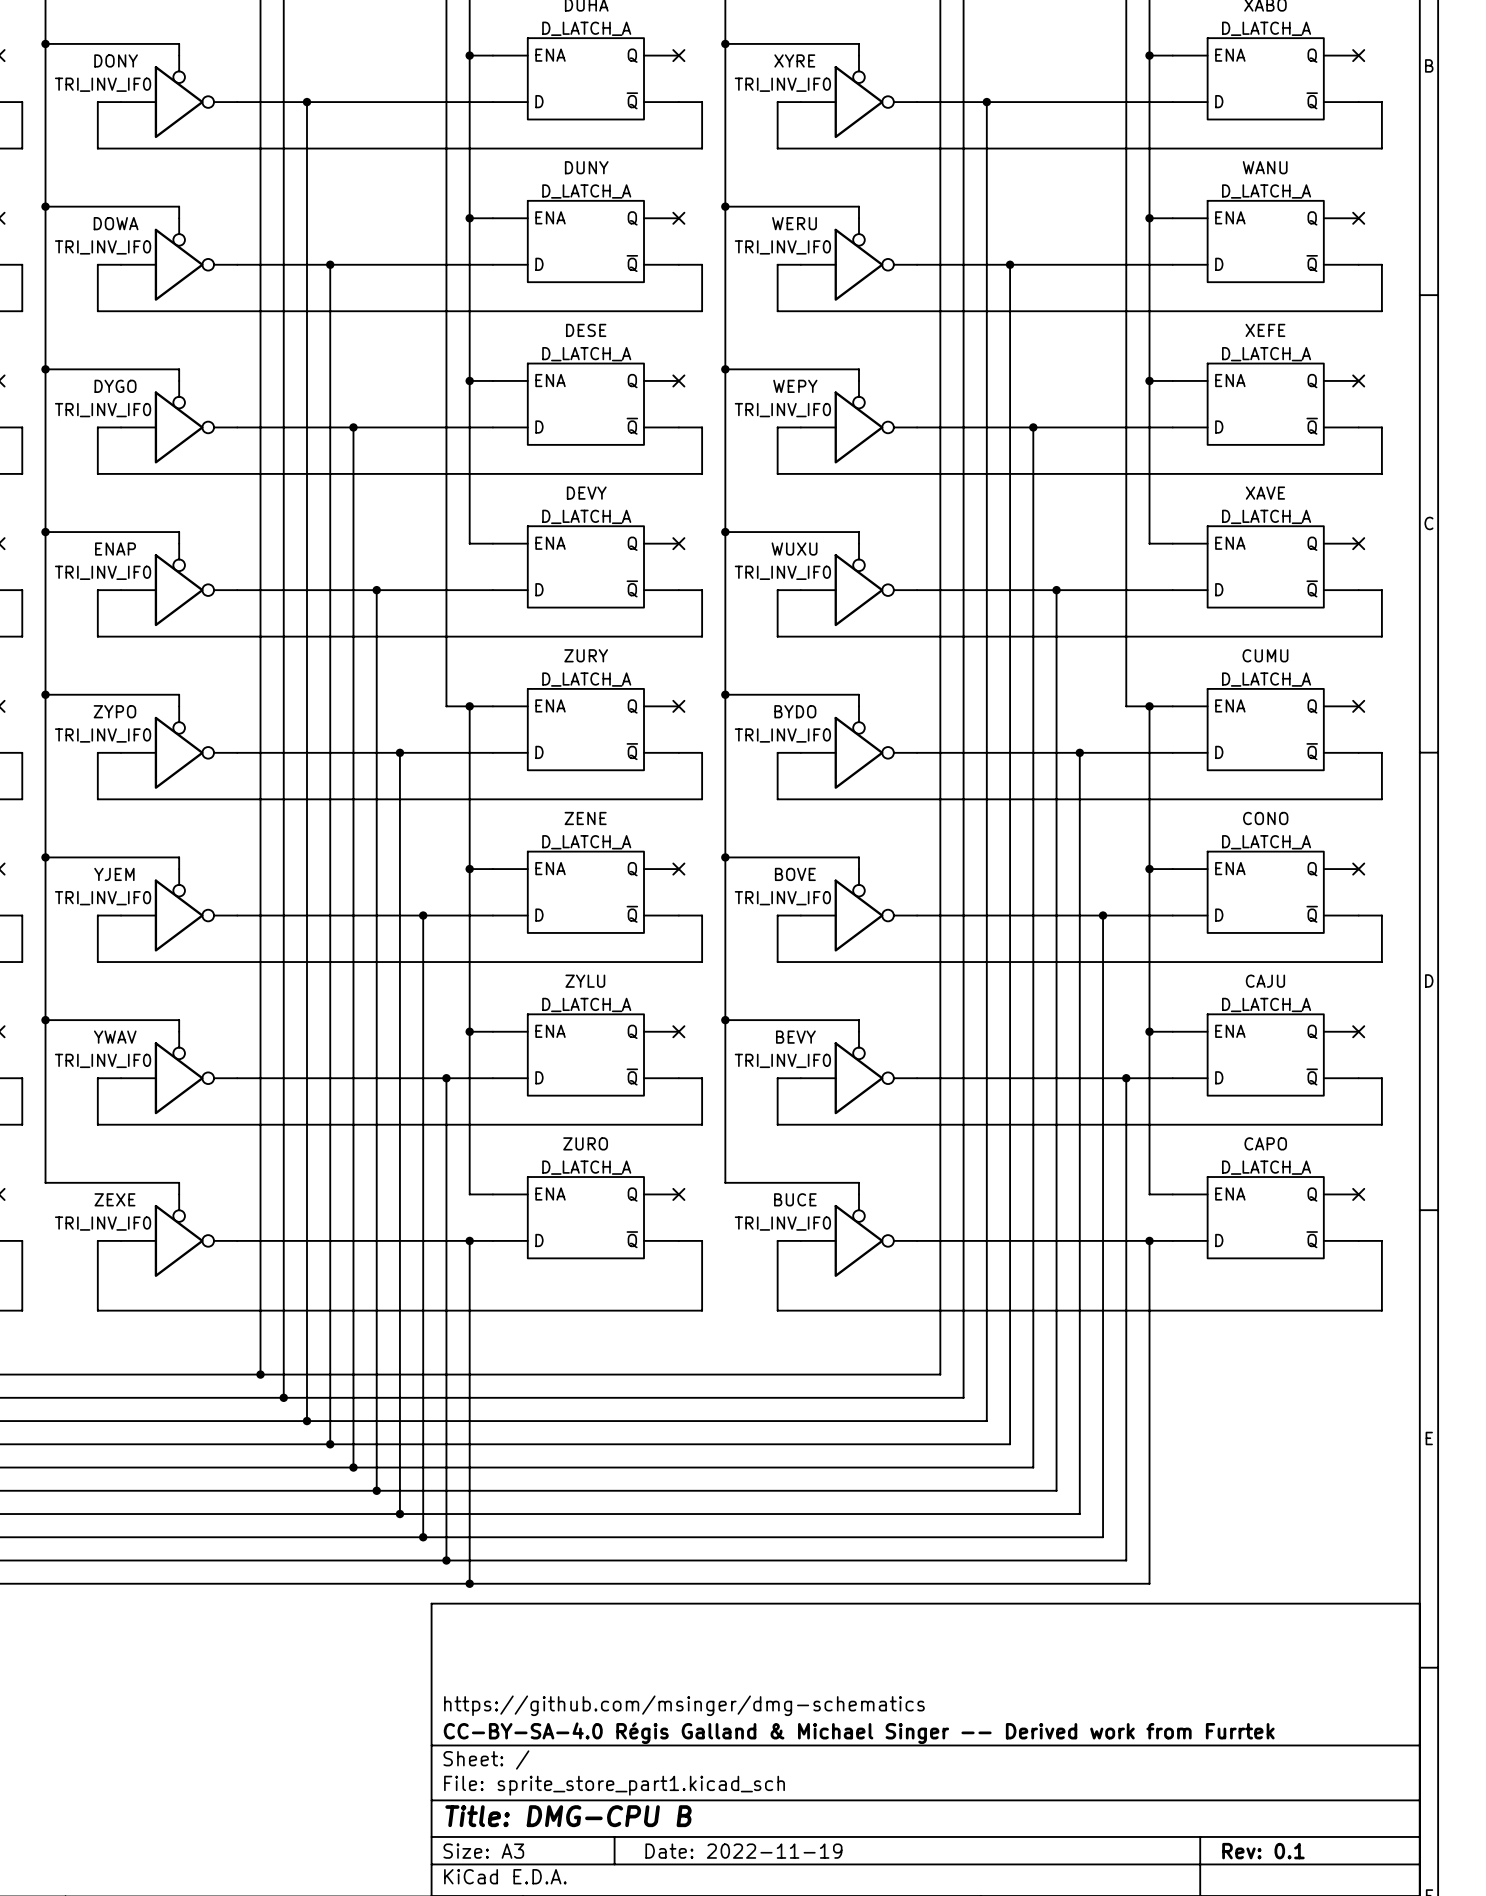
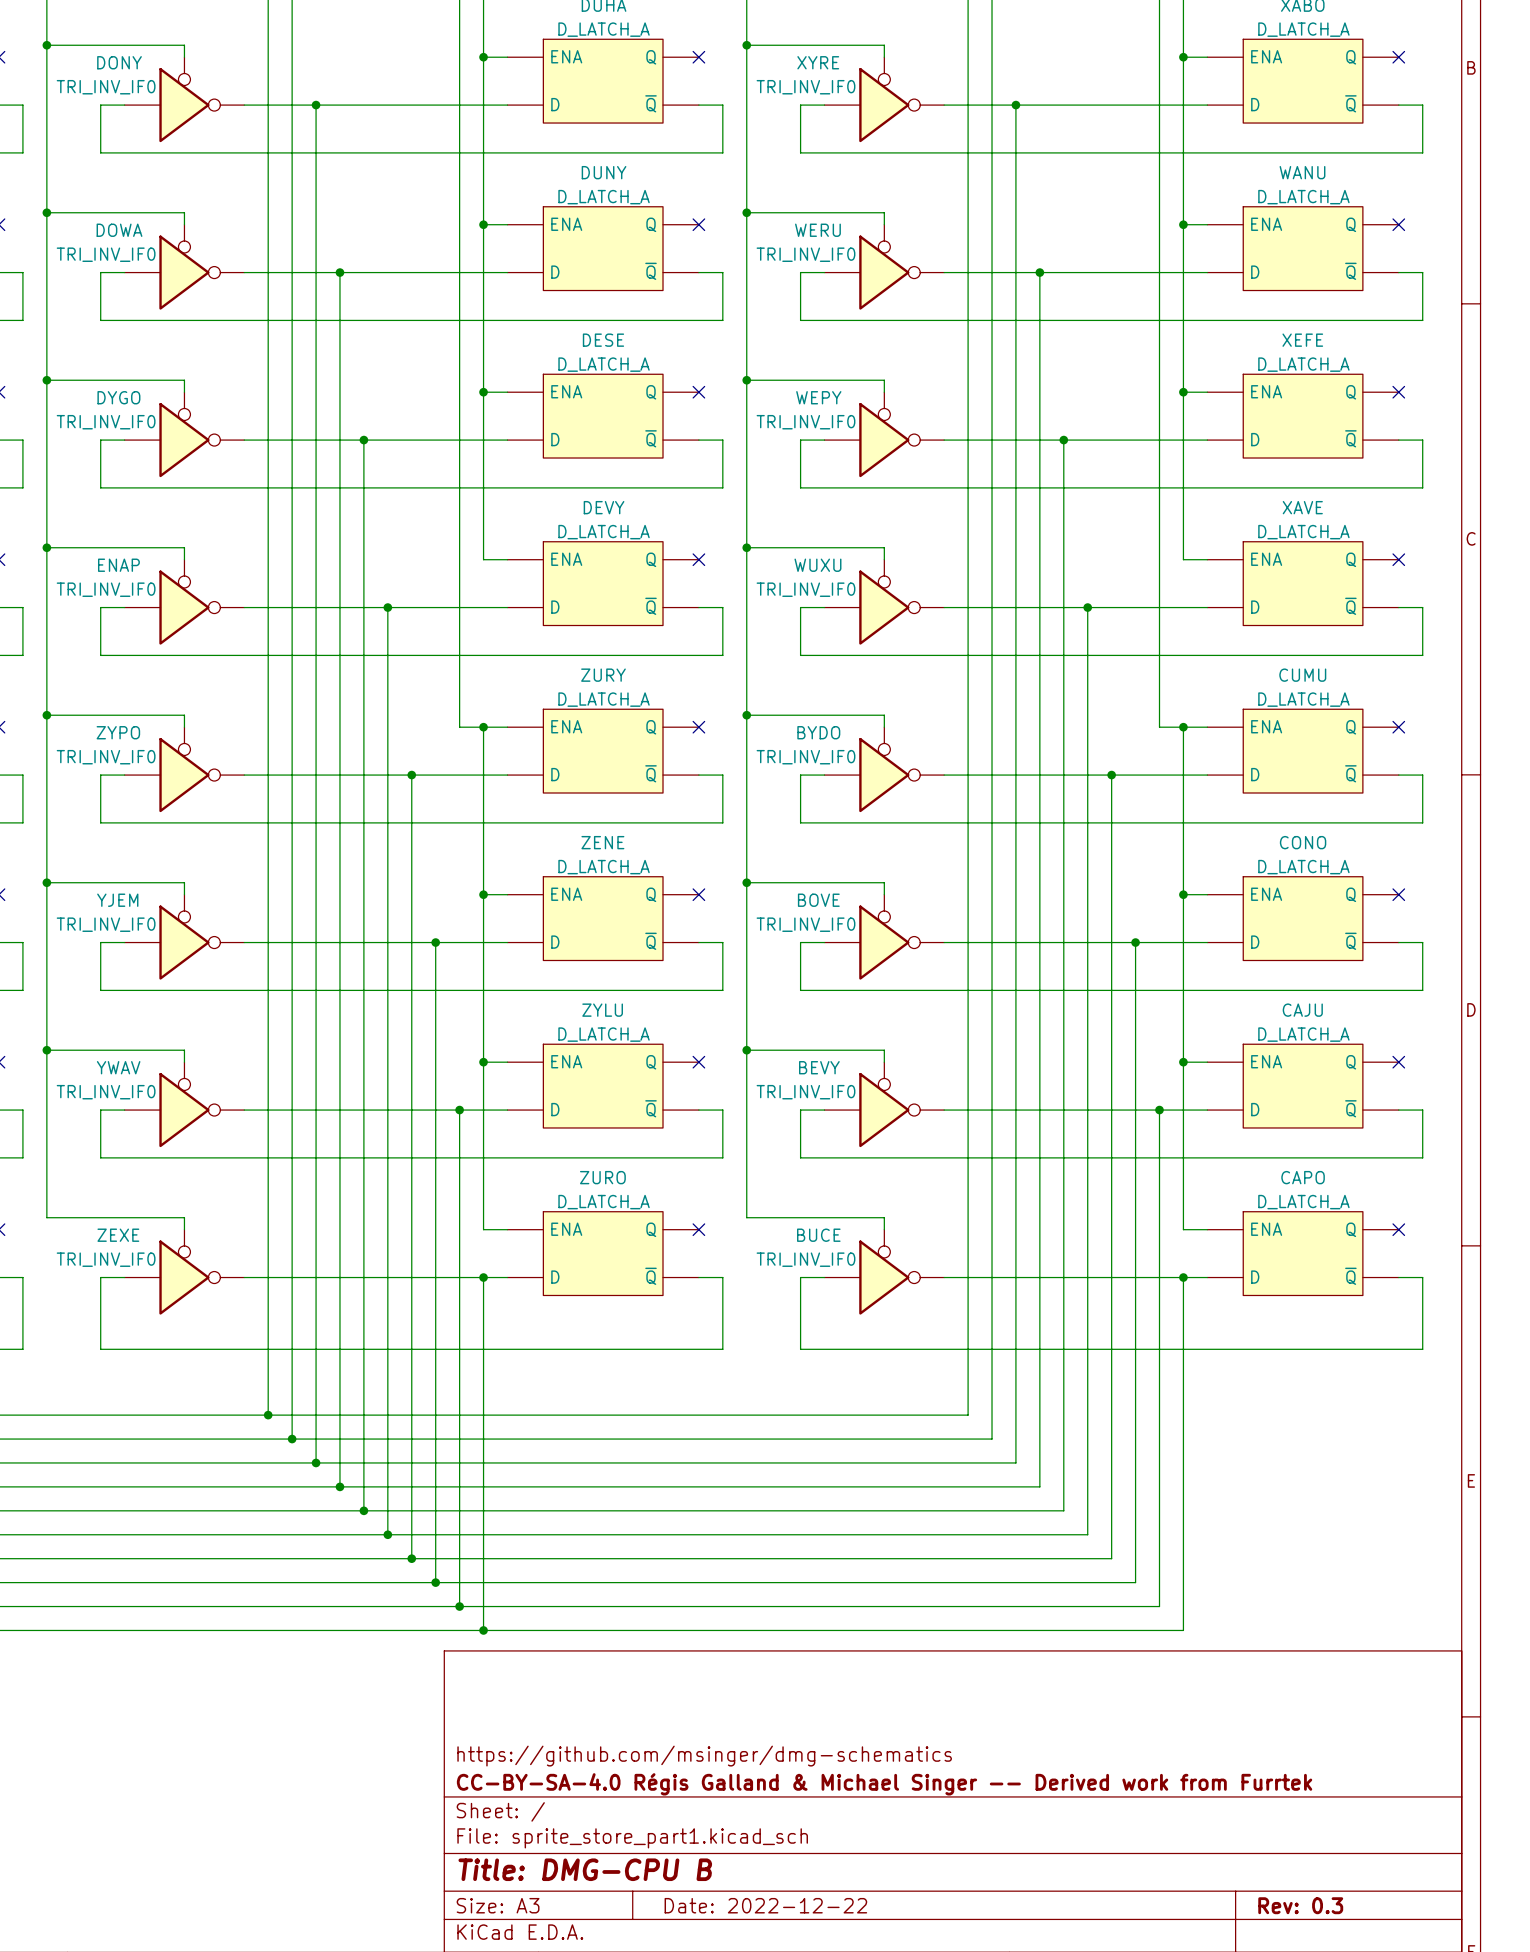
title block: Date: 2022-11-19 (743, 1851) -> Date: 2022-12-22 (765, 1905)
title block: Rev: 0.1 (1263, 1851) -> Rev: 0.3 (1300, 1905)

